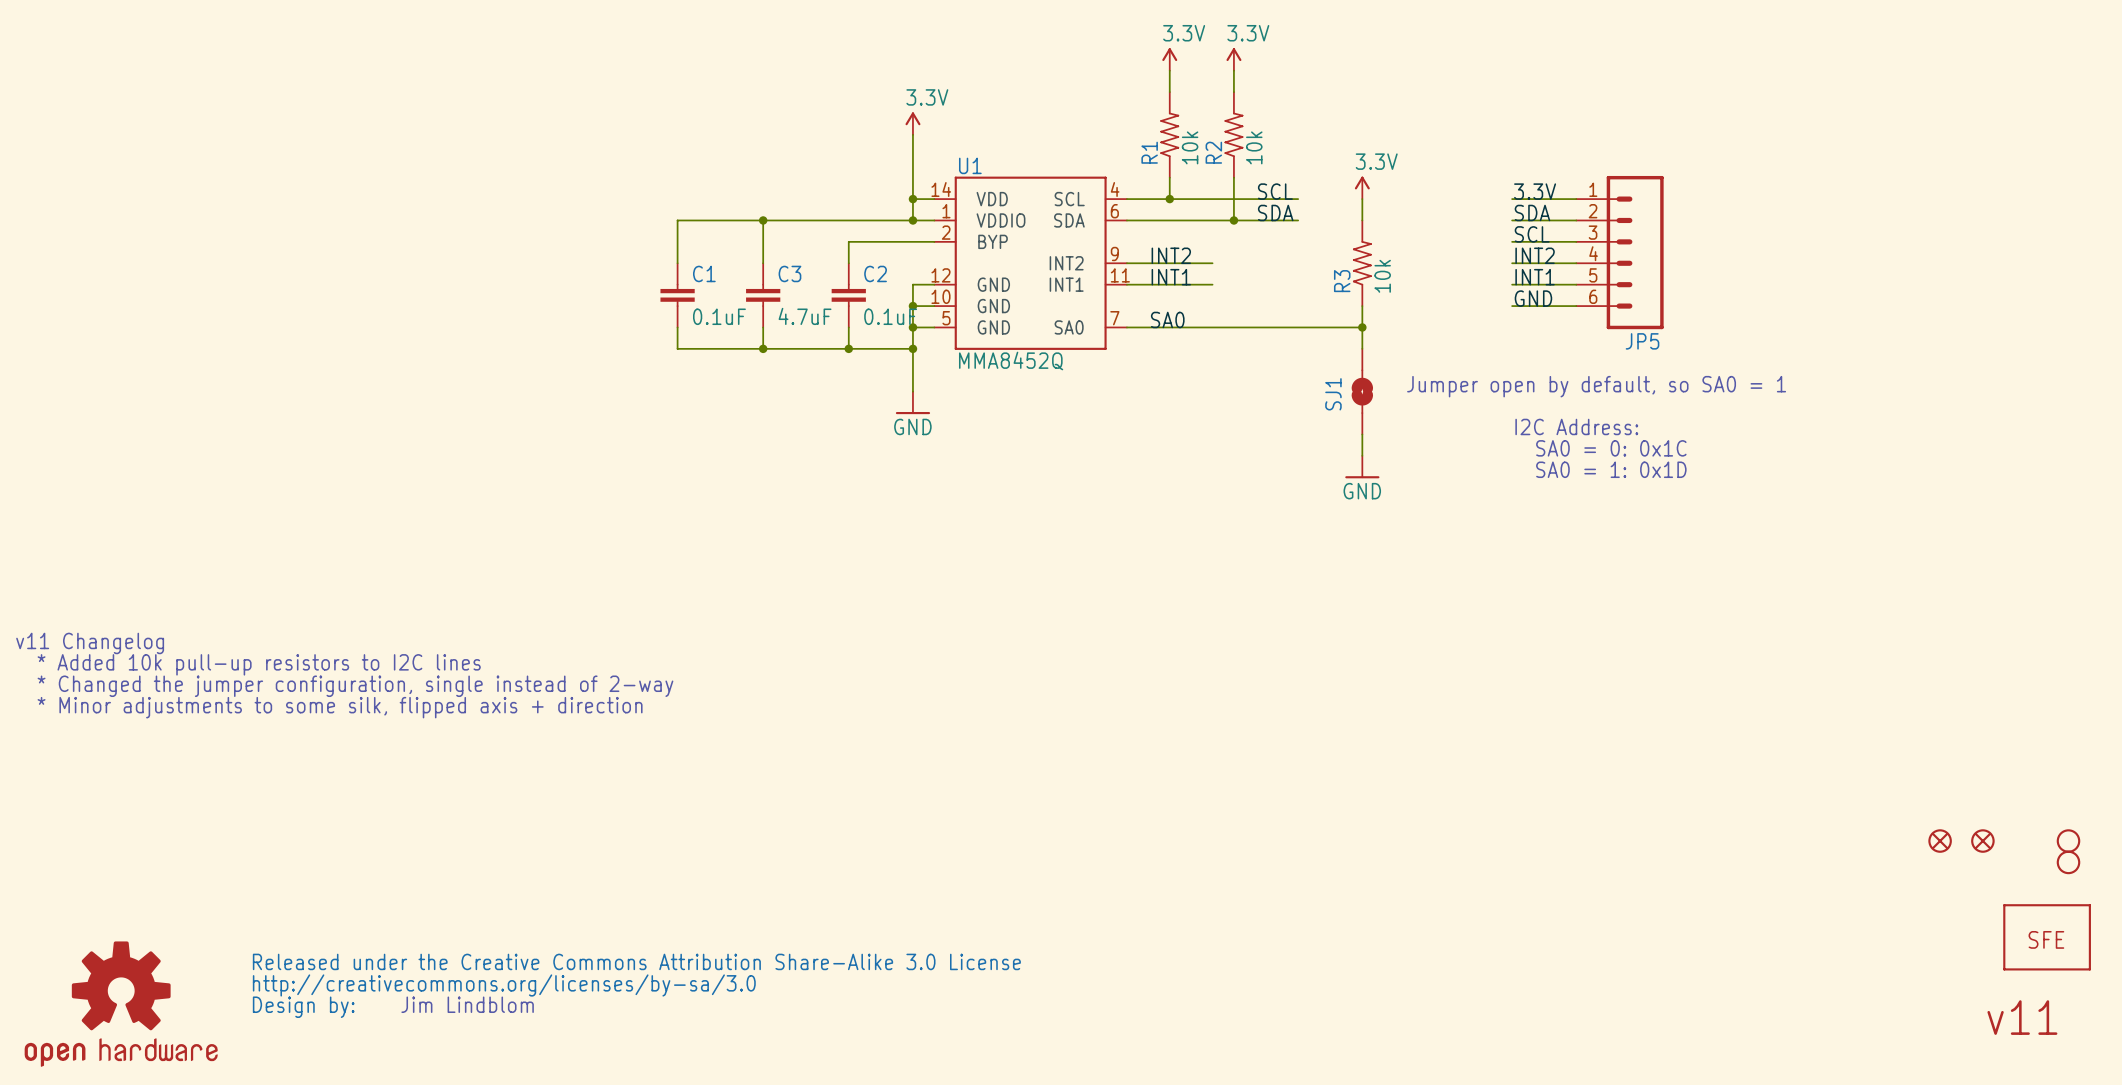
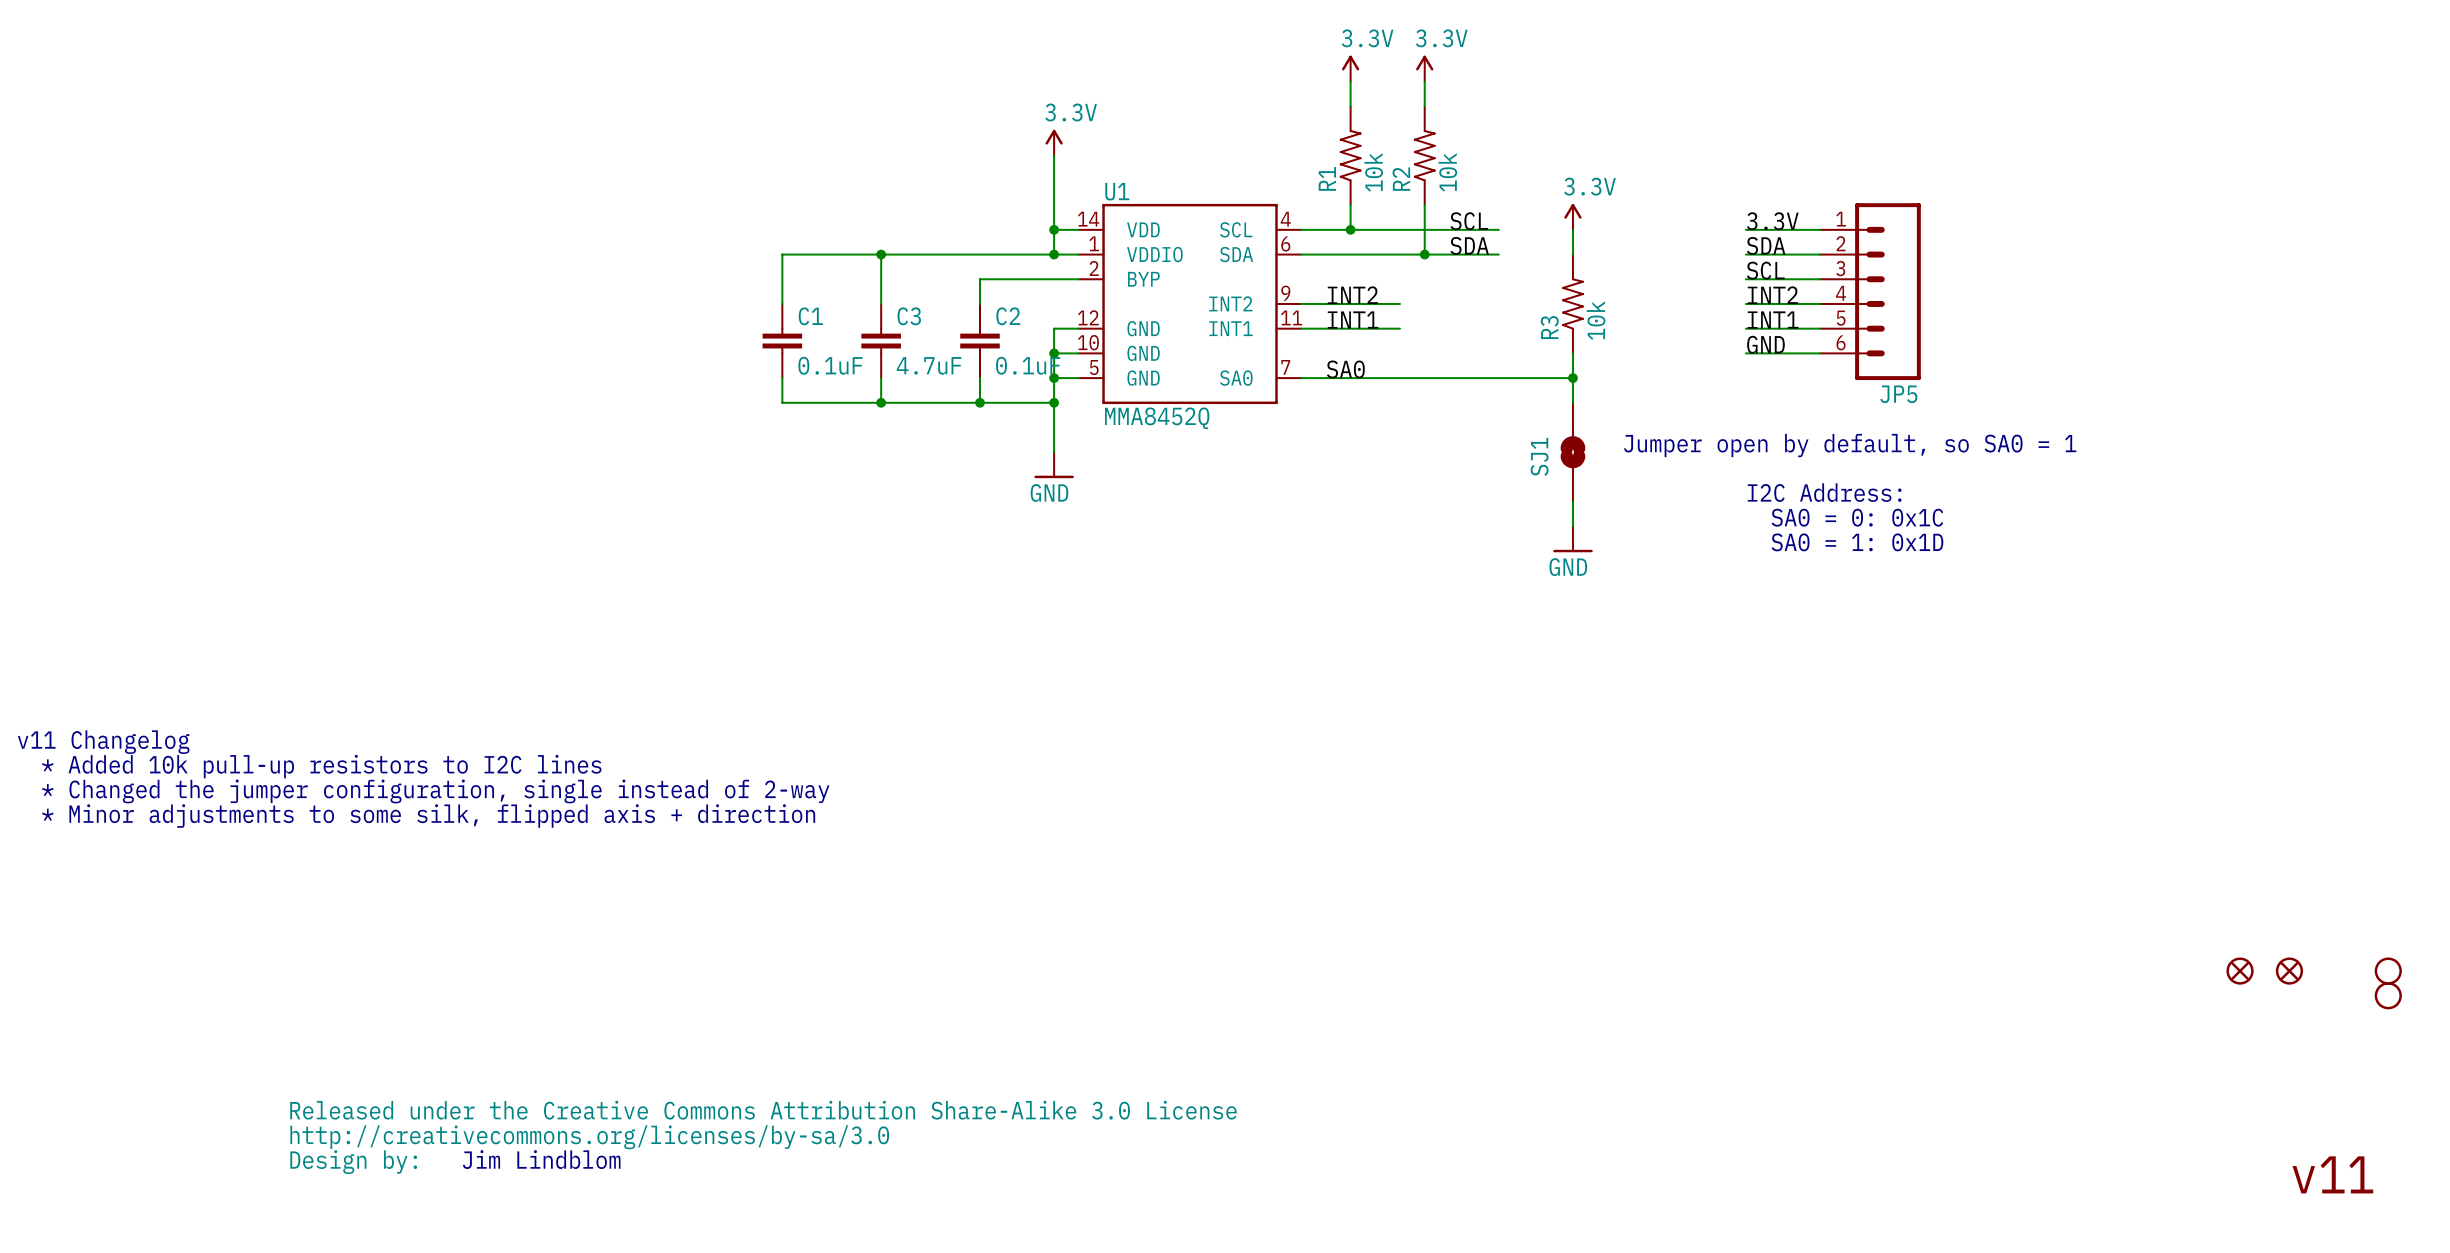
part: (2047, 937) -> none
part: (121, 1004) -> none

